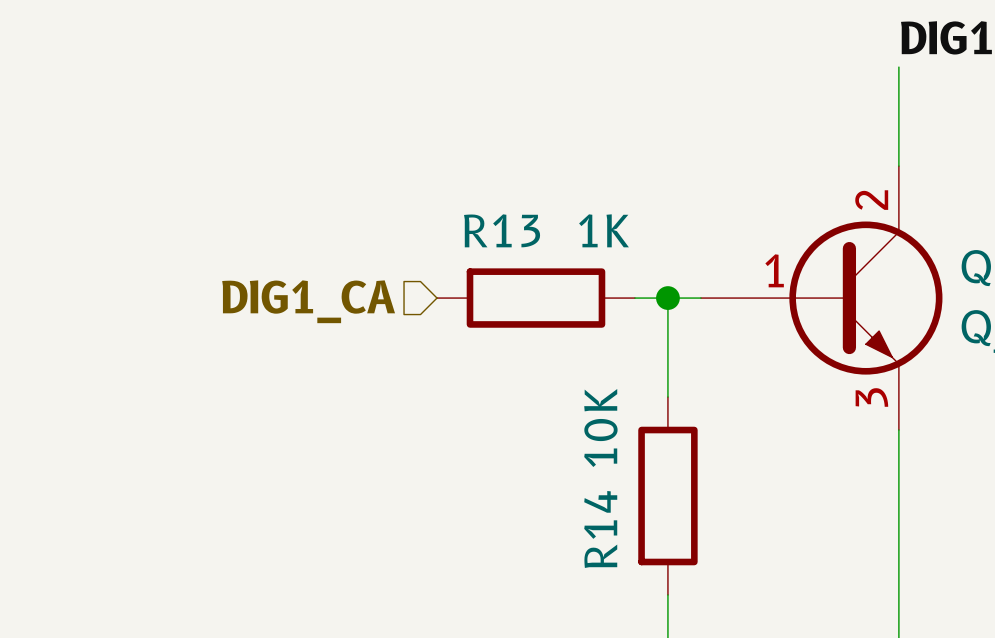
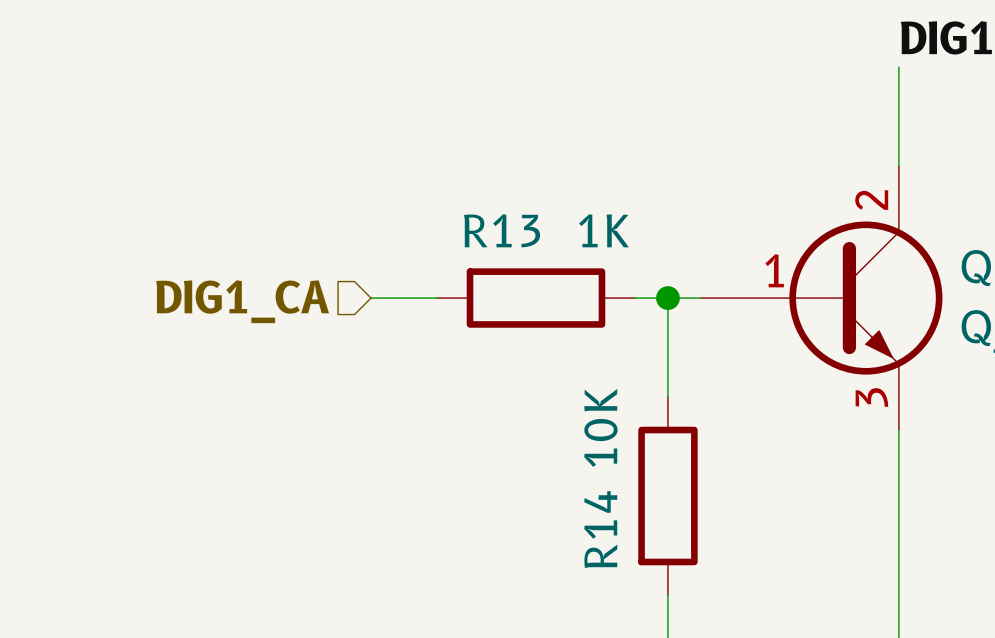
wire: none -> (371, 298) (437, 298)
hierarchical label position: DIG1_CA (308, 301) -> DIG1_CA (242, 301)

